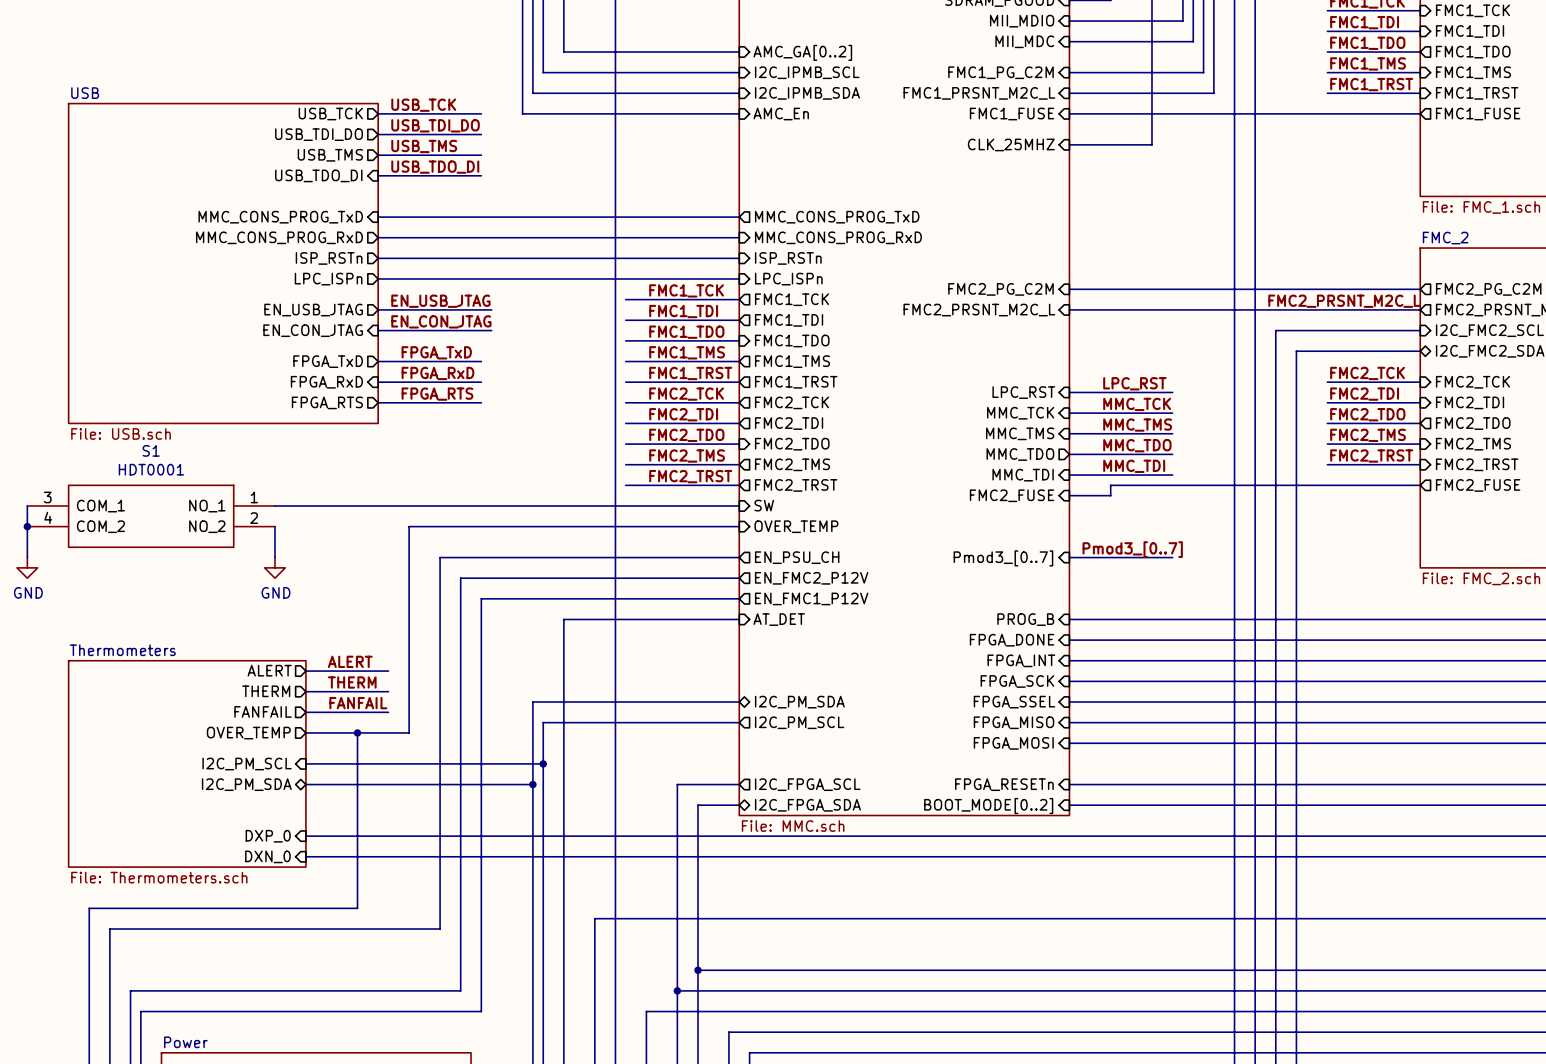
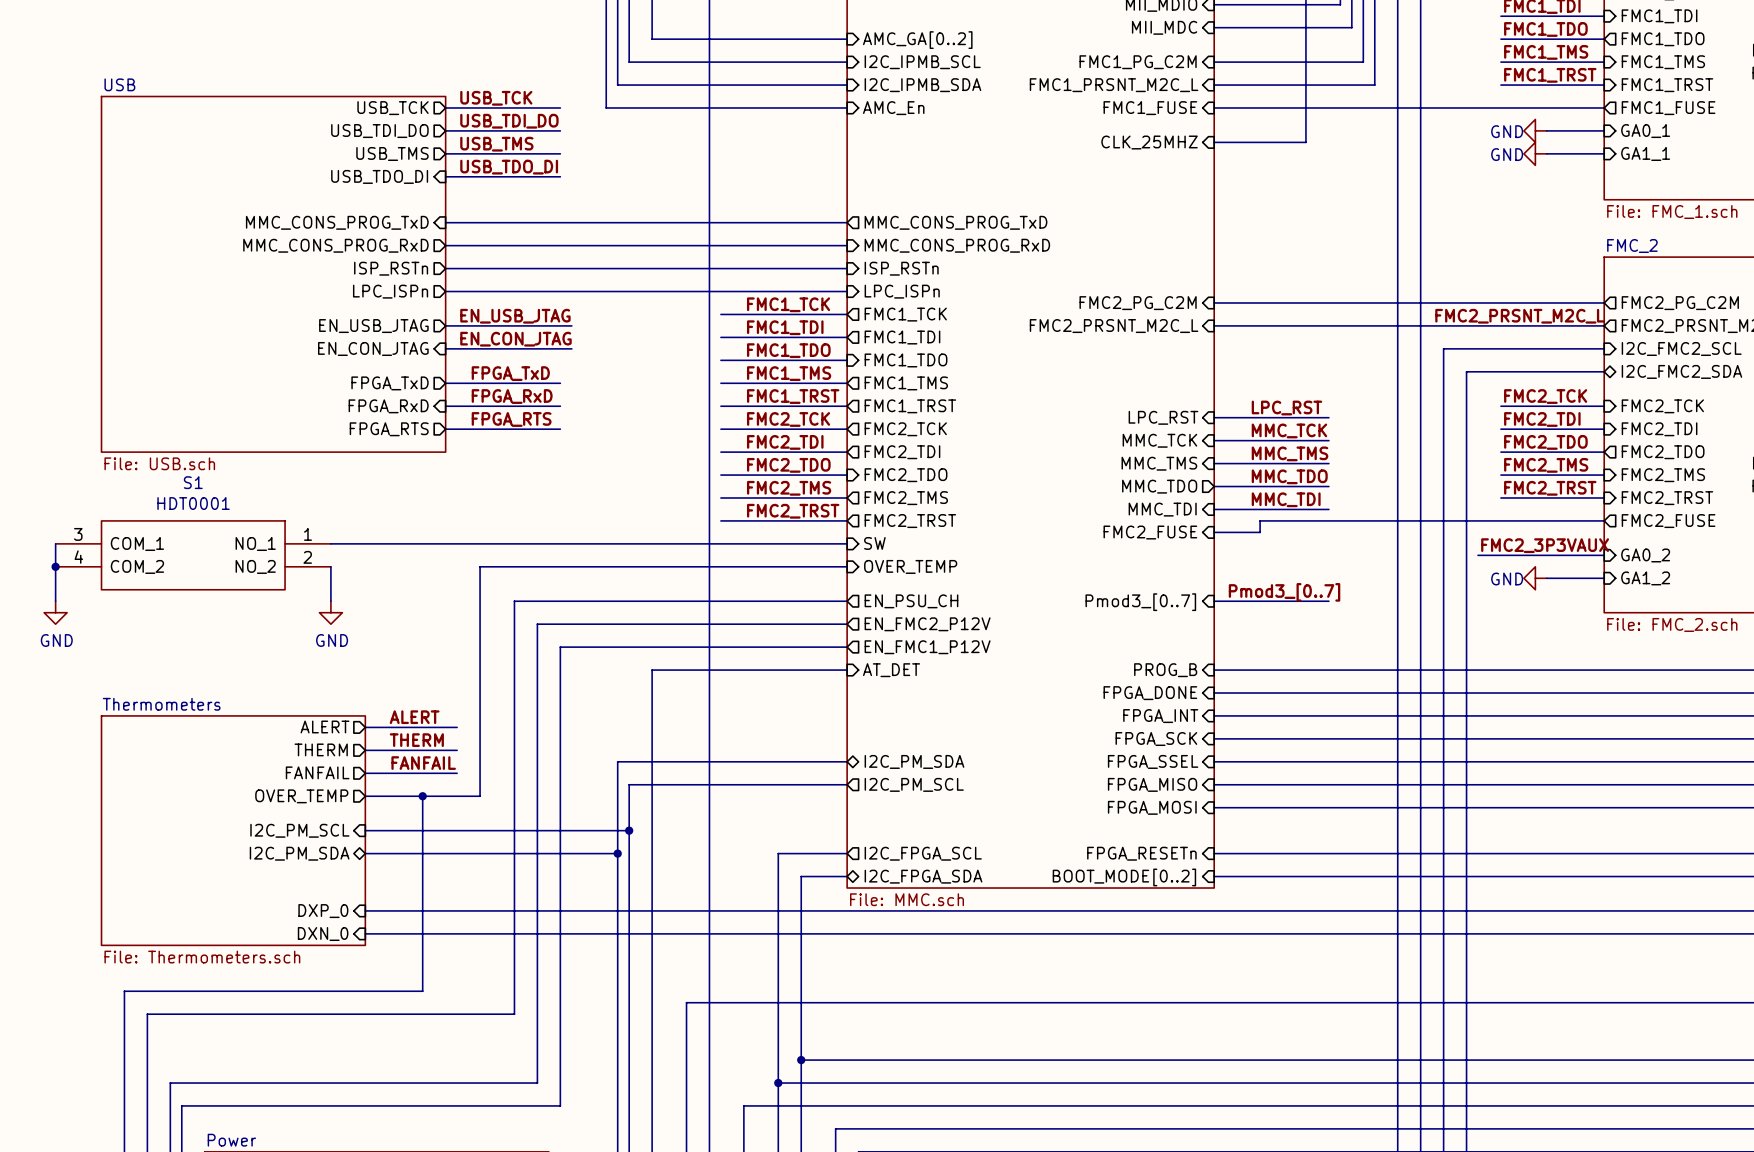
power symbol: none -> GND (1535, 130)
wire: none -> (1546, 130) (1604, 130)
sheet pin: none -> GA0_1 (1645, 131)
power symbol: none -> GND (1535, 153)
wire: none -> (1546, 153) (1604, 153)
sheet pin: none -> GA1_1 (1645, 153)
label: none -> FMC2_3P3VAUX (1545, 545)
wire: none -> (1478, 555) (1604, 555)
sheet pin: none -> GA0_2 (1645, 555)
power symbol: none -> GND (1535, 578)
wire: none -> (1546, 578) (1604, 578)
sheet pin: none -> GA1_2 (1645, 578)

